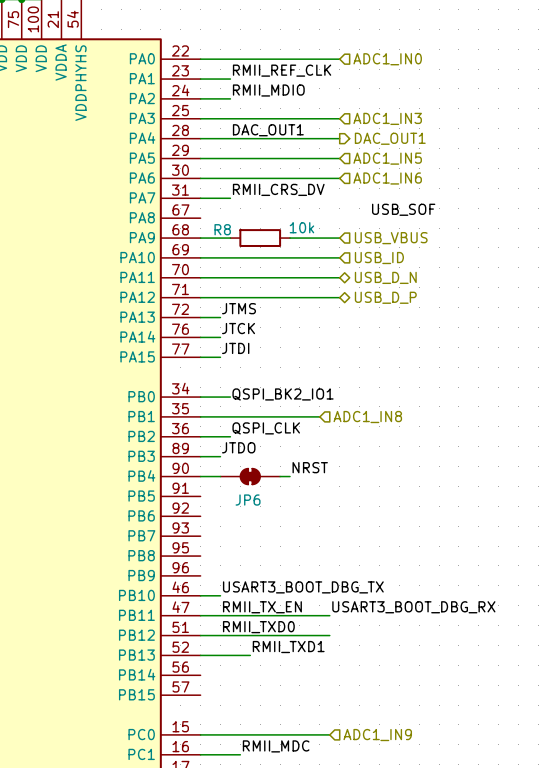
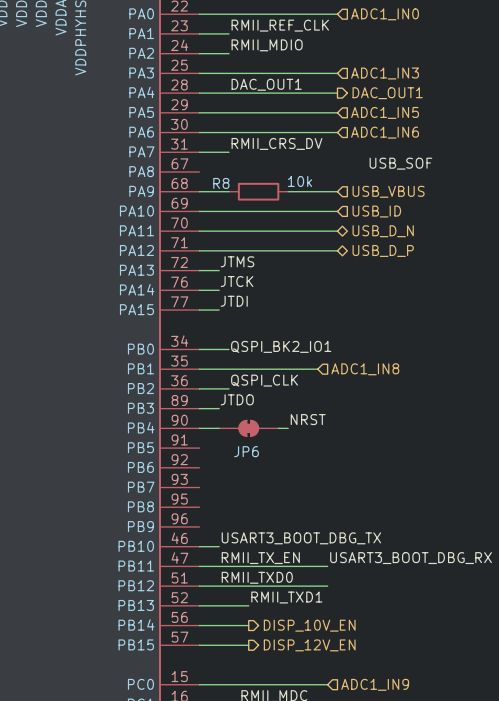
wire: none -> (199, 625) (248, 625)
hierarchical label: none -> DISP_10V_EN (309, 625)
wire: none -> (199, 645) (248, 645)
hierarchical label: none -> DISP_12V_EN (309, 645)

